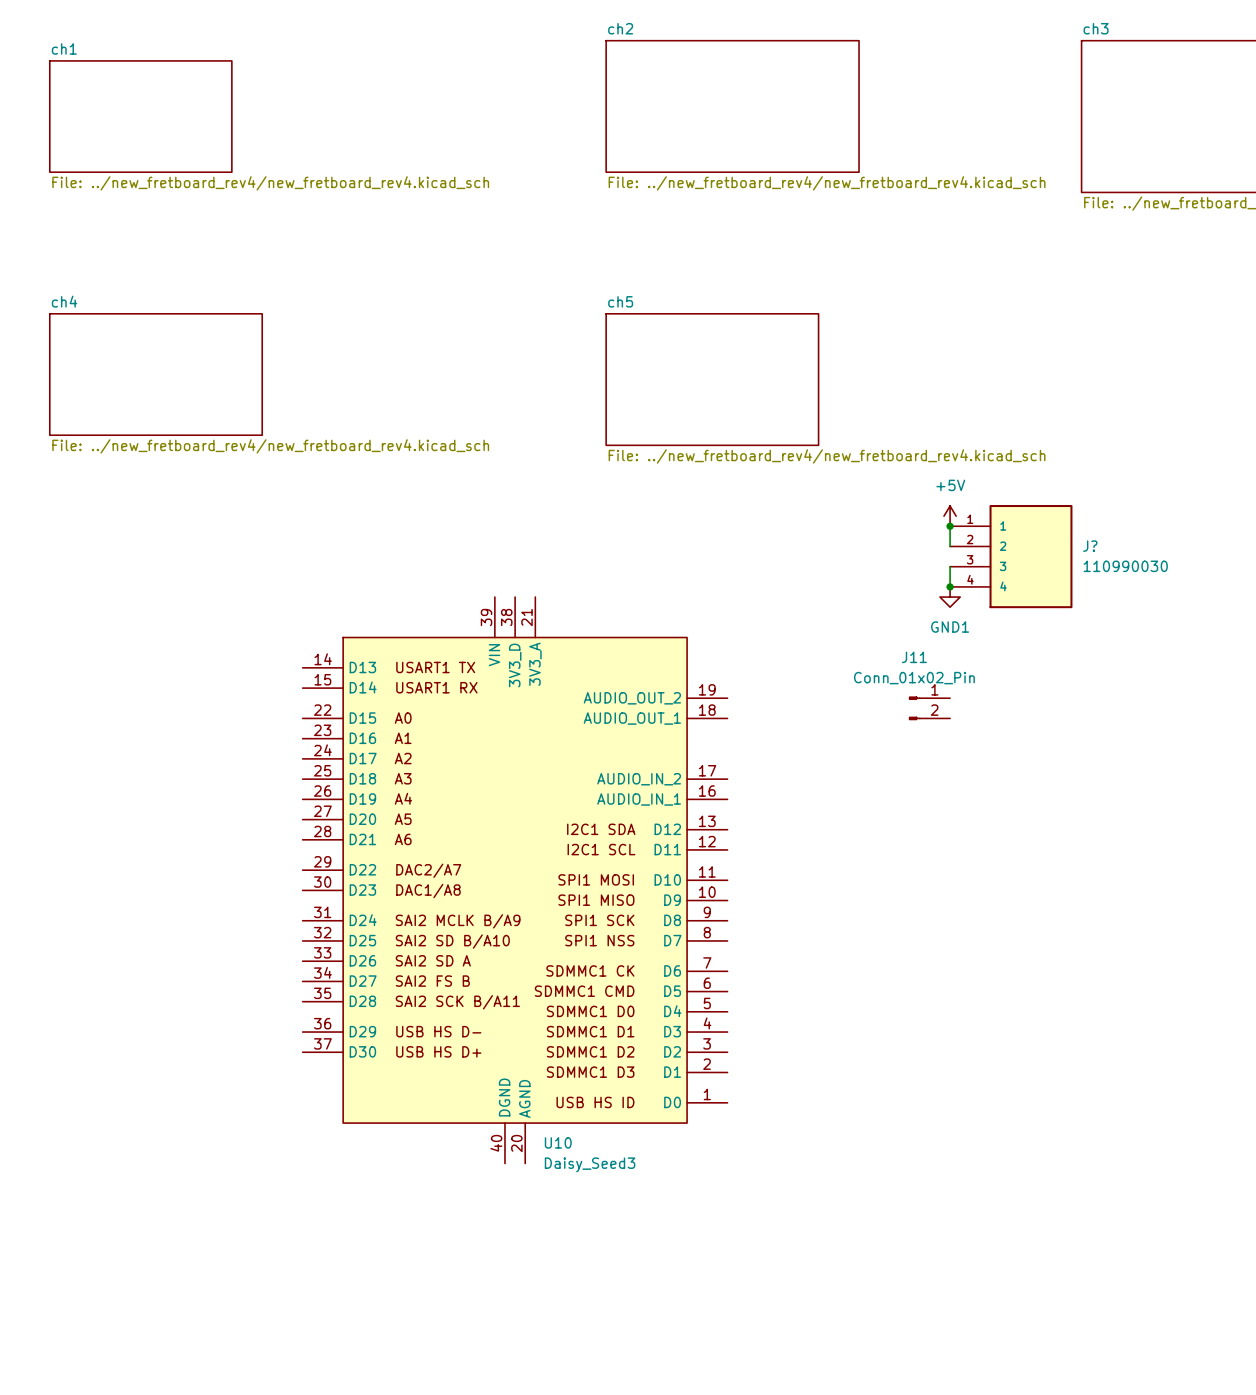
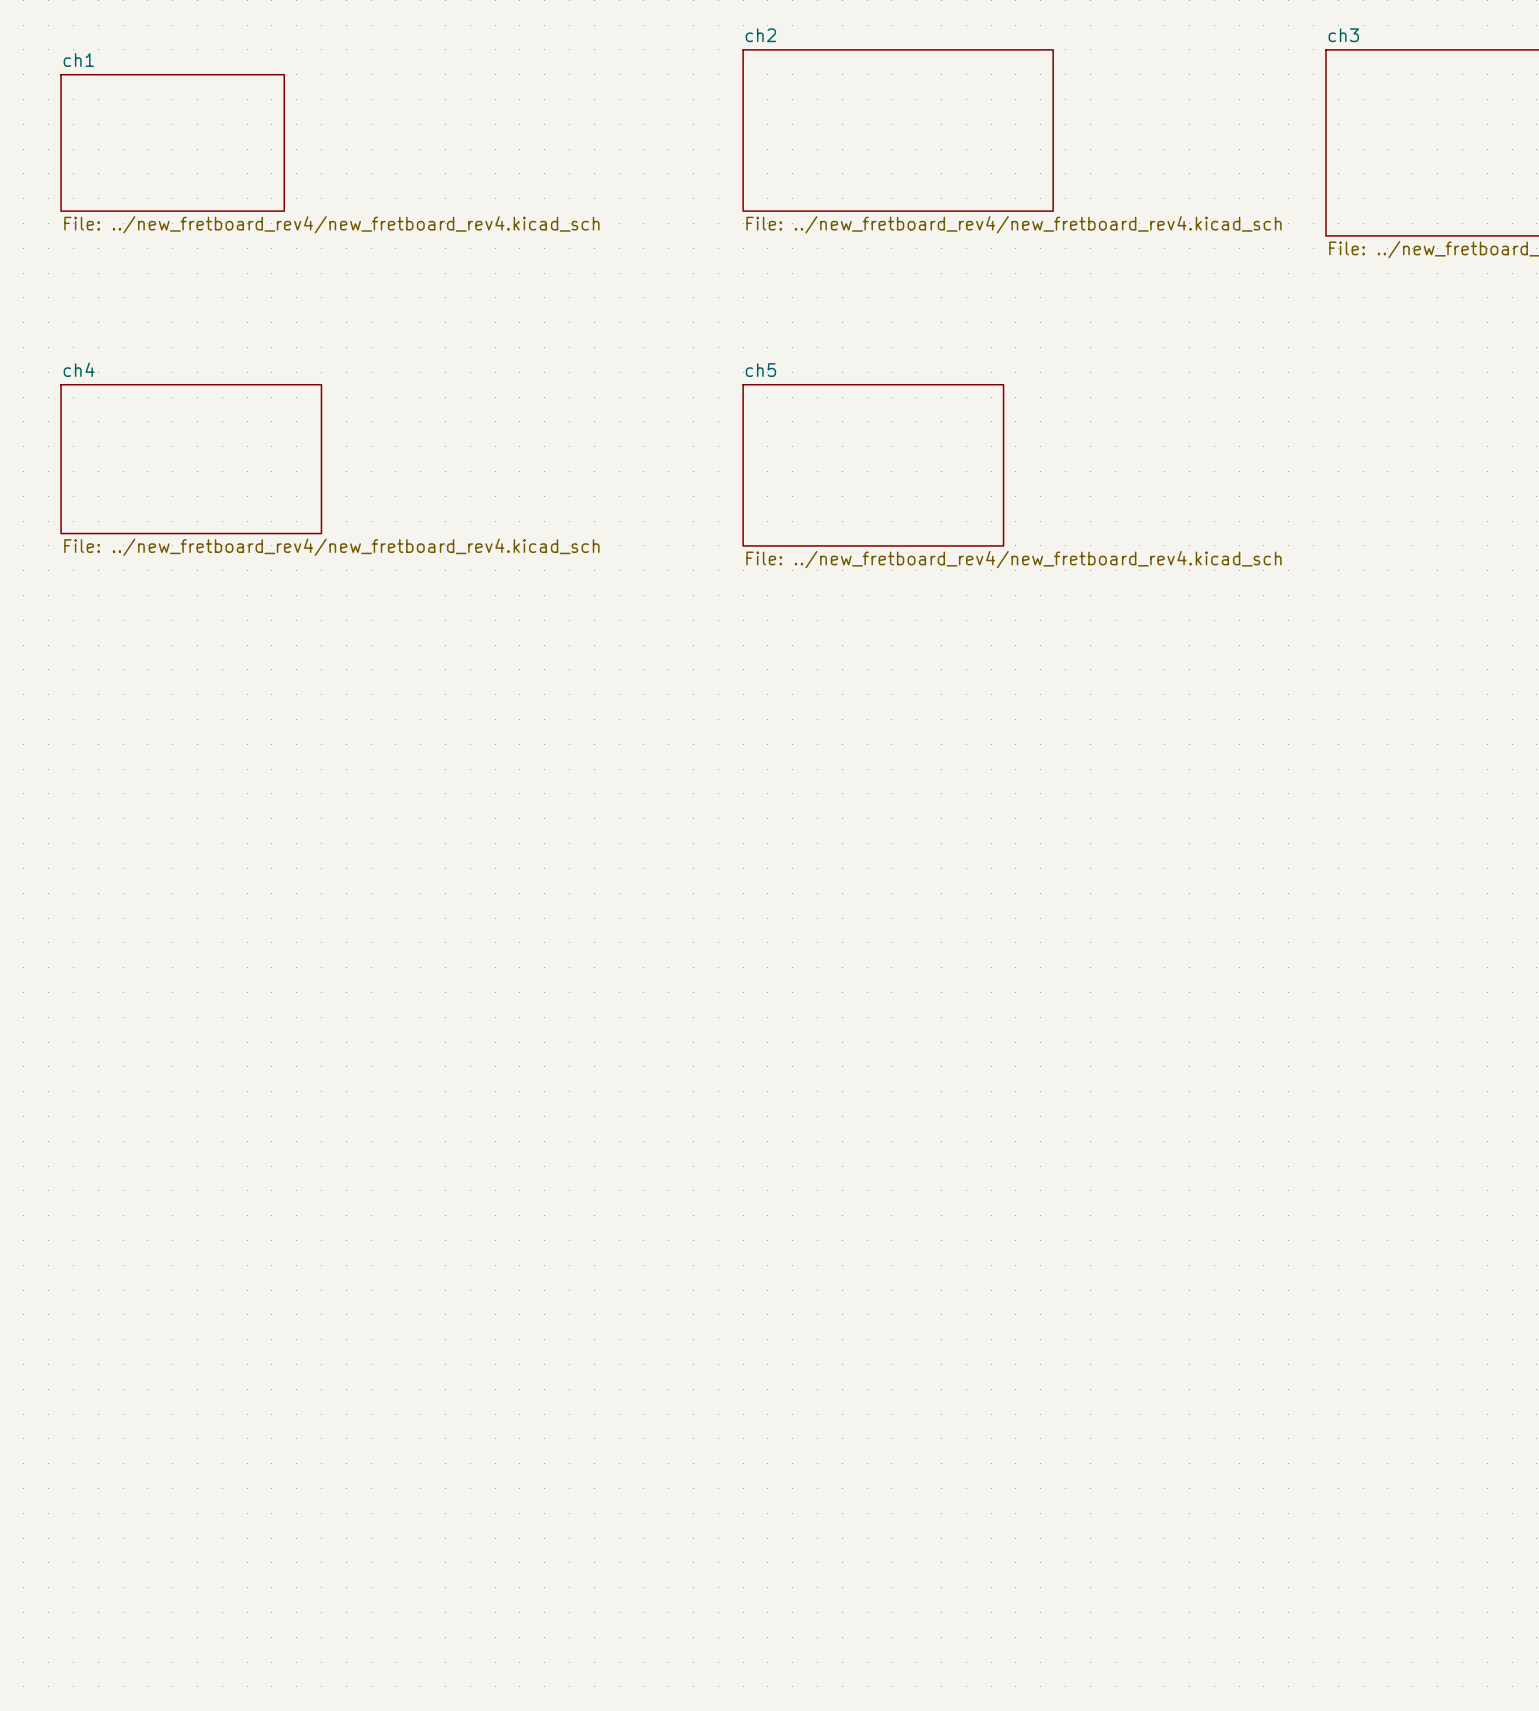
power symbol: +5V (950, 516) -> none
wire: (950, 526) (950, 546) -> none
junction: (950, 526) -> none
J?: 110990030 (1011, 556) -> none
wire: (950, 566) (950, 586) -> none
junction: (950, 586) -> none
power symbol: GND1 (950, 597) -> none
J11: Conn_01x02_Pin (929, 708) -> none
U10: Daisy_Seed3 (515, 880) -> none

